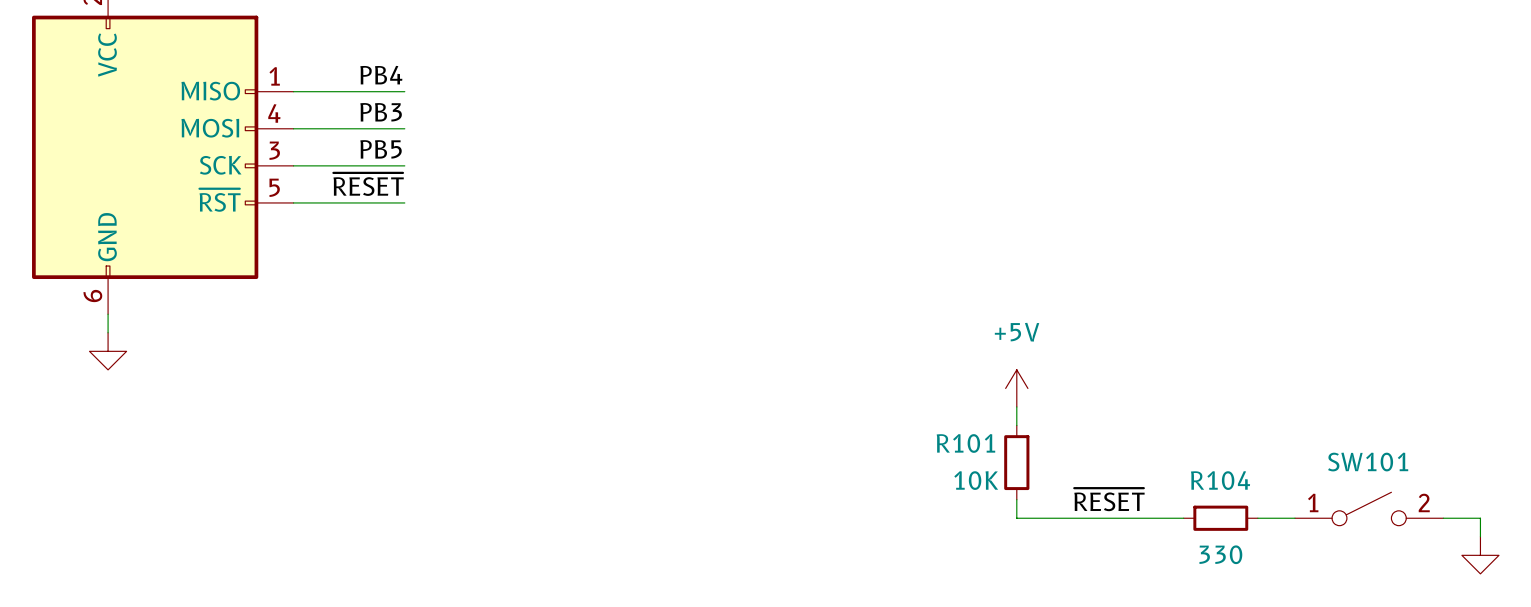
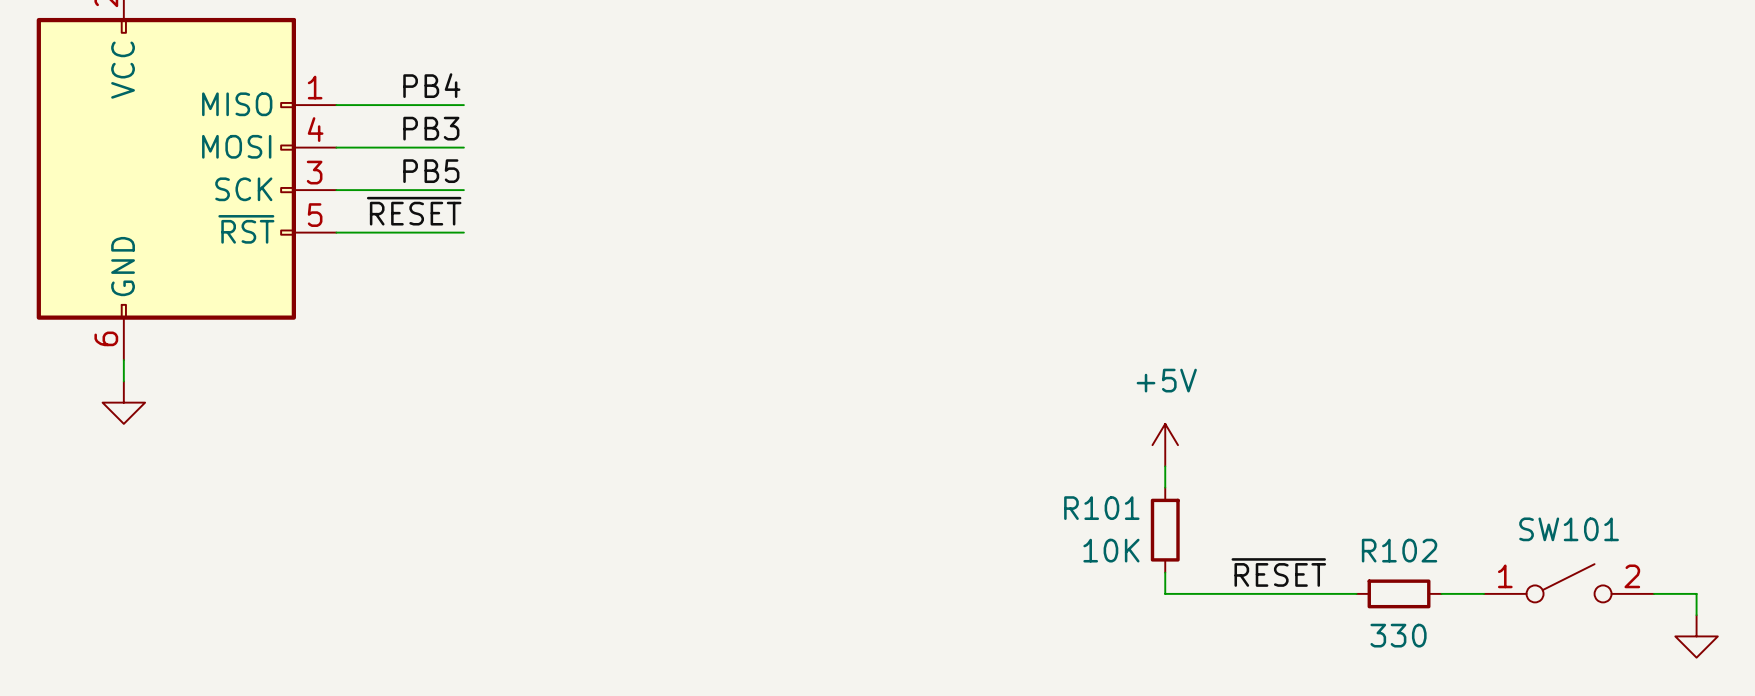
R104 name: R104 (1220, 480) -> R102 (1399, 550)

